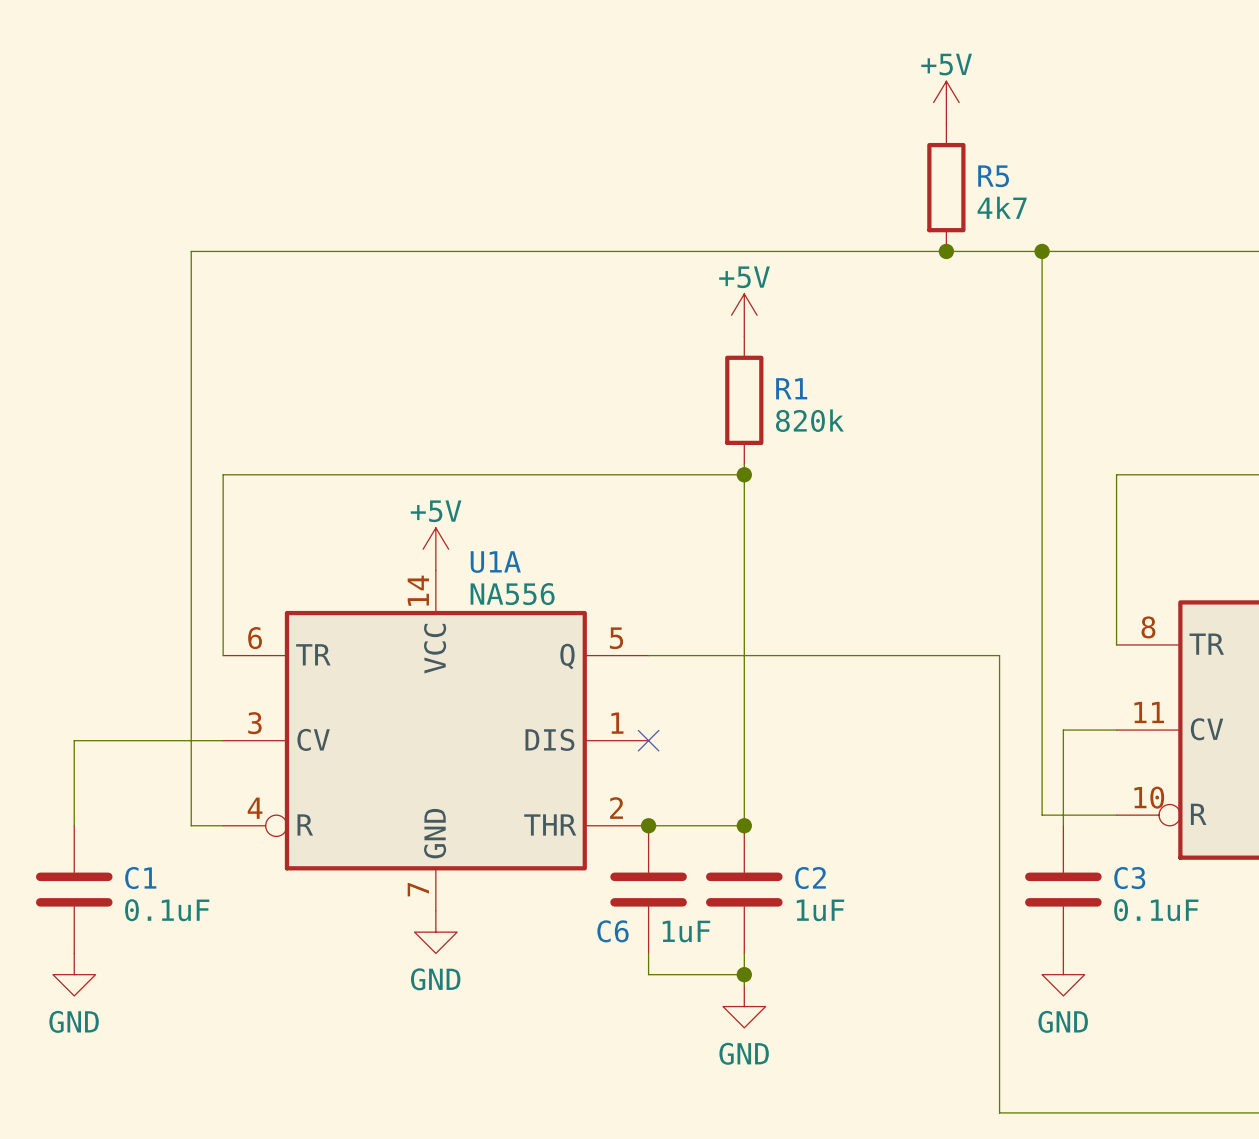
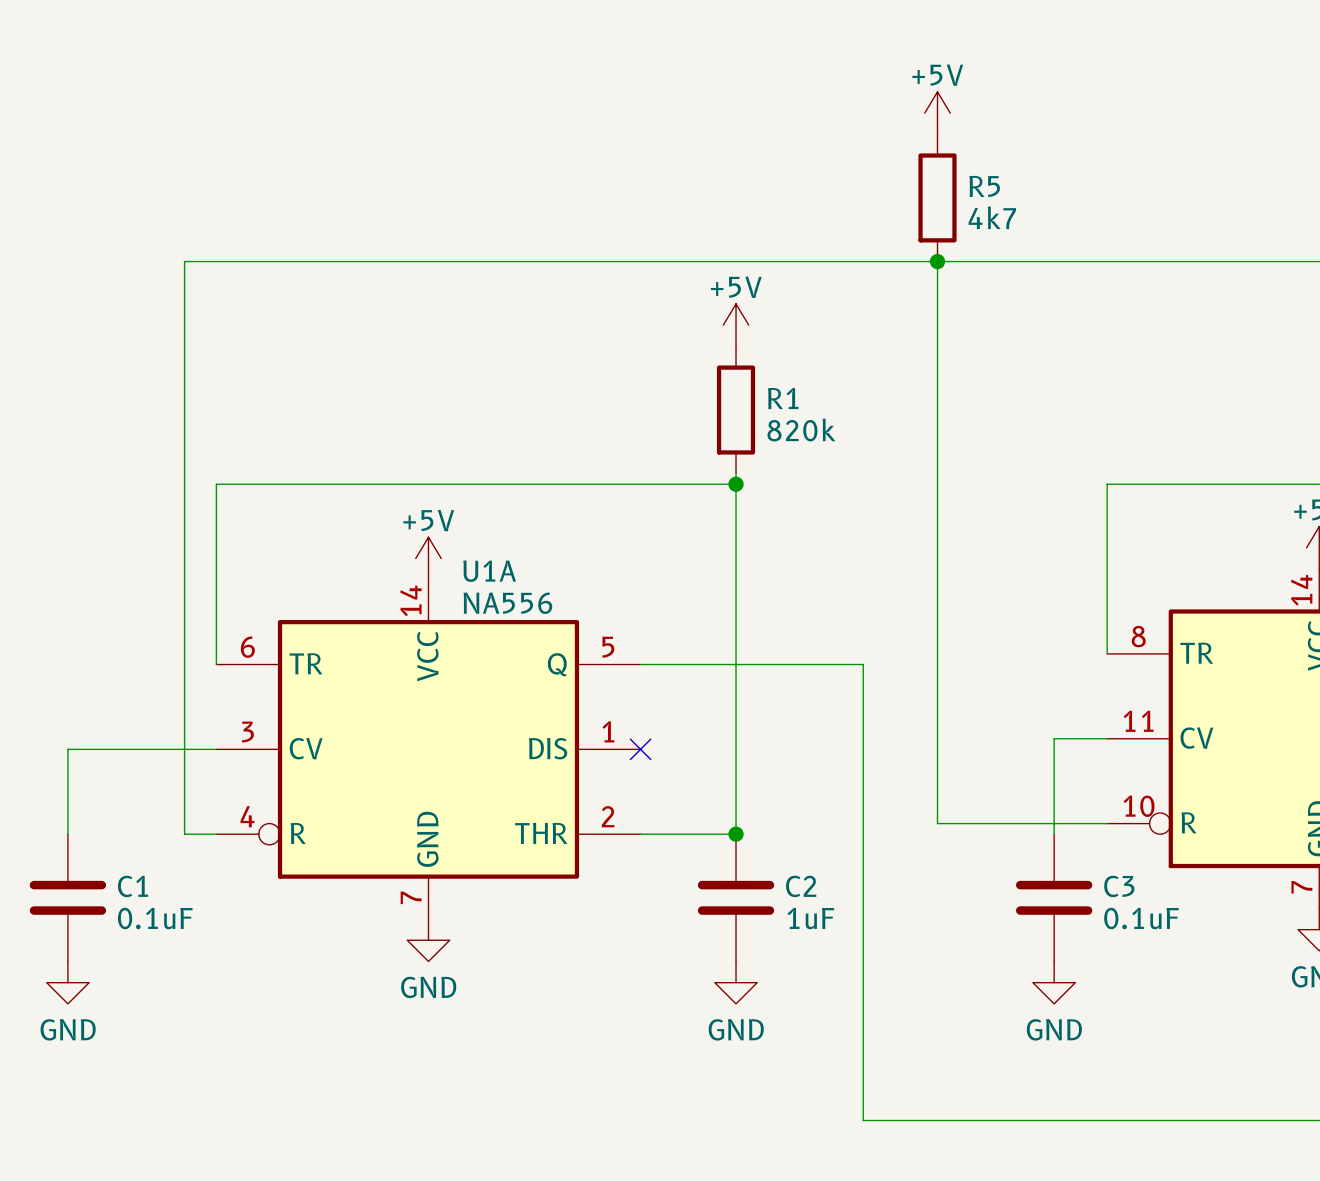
wire: (1042, 251) (1042, 815) -> (937, 261) (937, 823) (1032, 823)
junction: (1042, 251) -> none
wire: (871, 655) (999, 655) (999, 1112) -> (863, 664) (863, 1120) (990, 1120)
junction: (648, 825) -> none
C6: 1uF (648, 889) -> none
wire: (648, 953) (648, 974) (744, 974) -> none
junction: (744, 974) -> none
power symbol position: GND (744, 1006) -> GND (736, 982)

